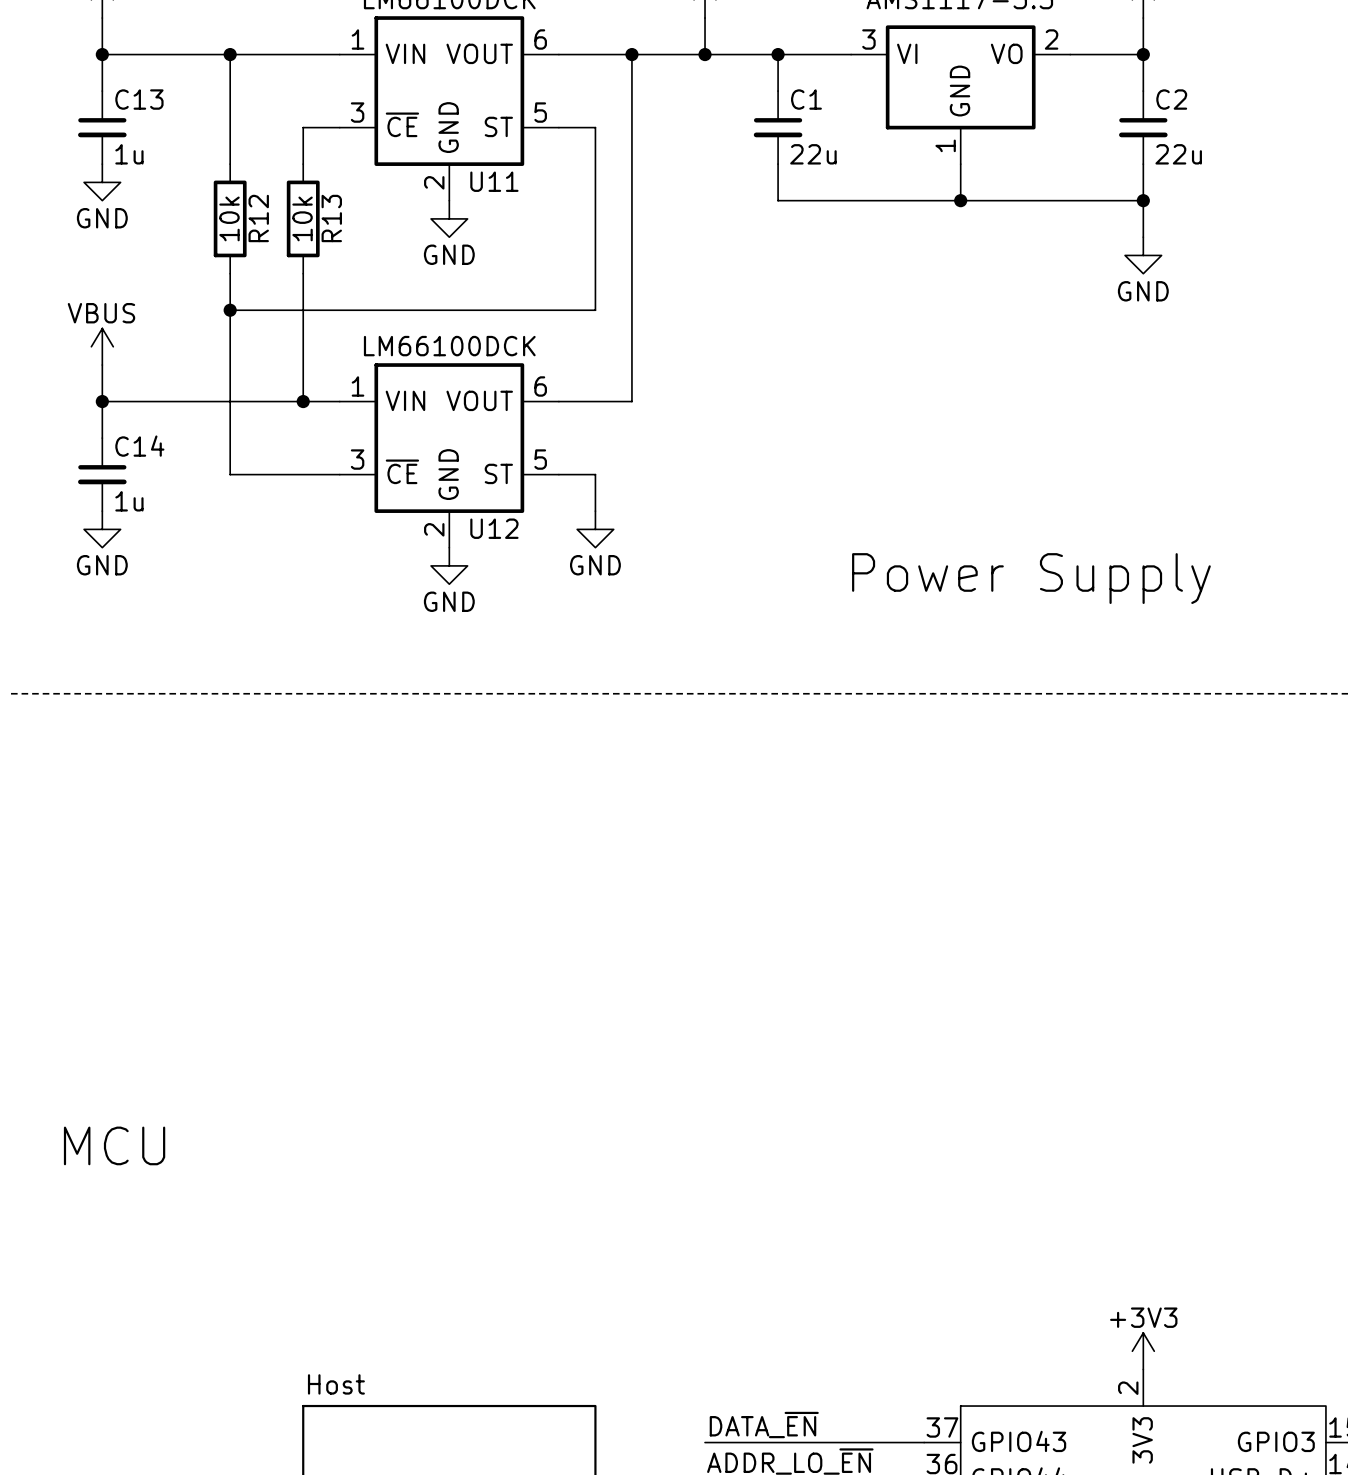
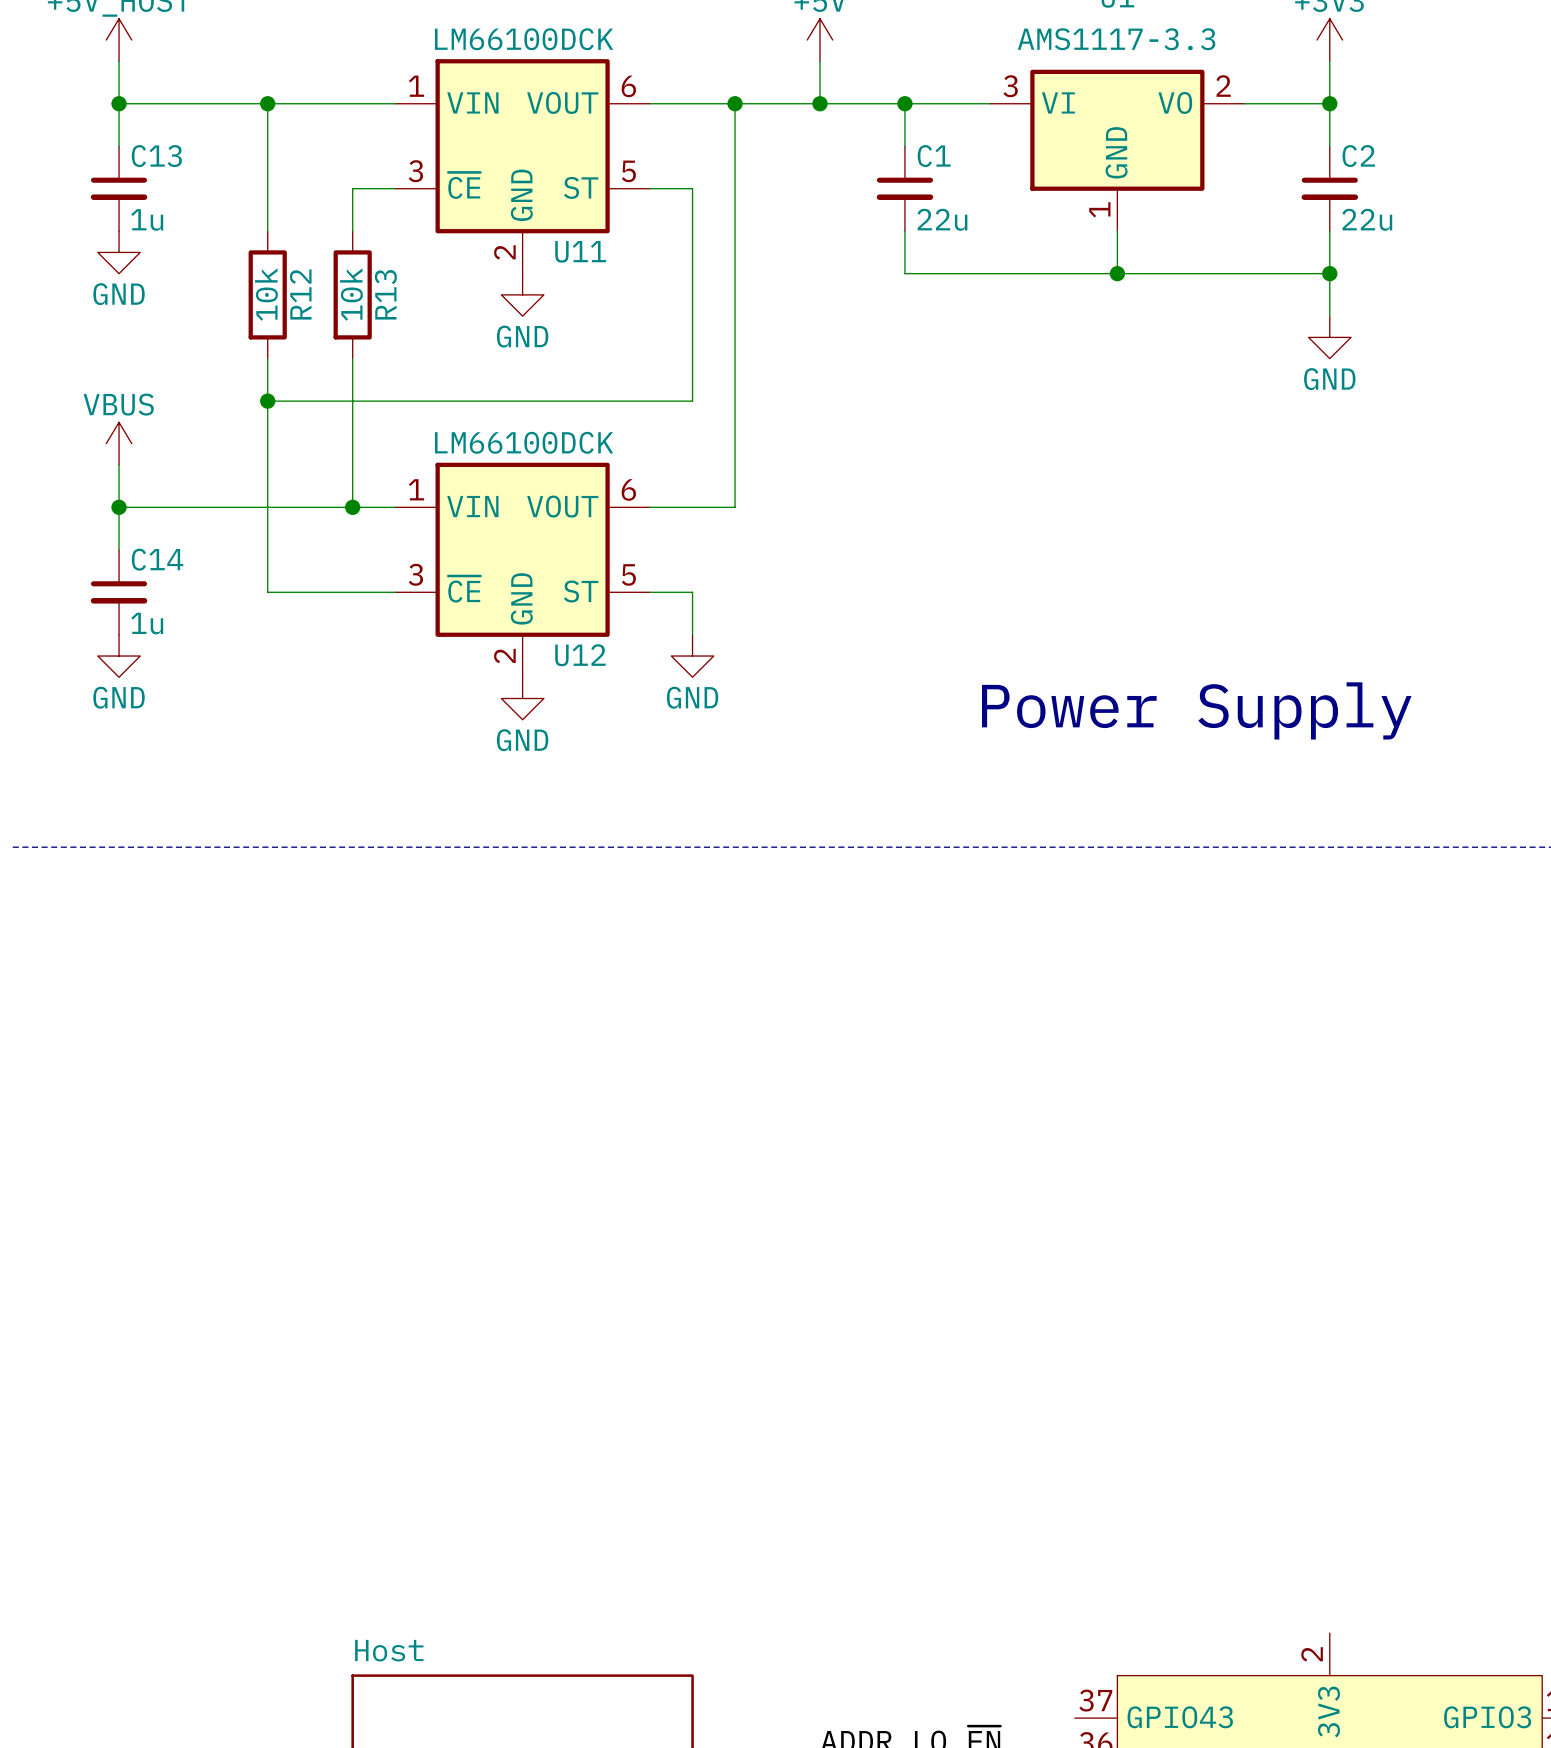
text: MCU (114, 1145) -> none
power symbol: +3V3 (1143, 1351) -> none
label: DATA_~{EN} (764, 1425) -> none
wire: (705, 1442) (924, 1442) -> none

